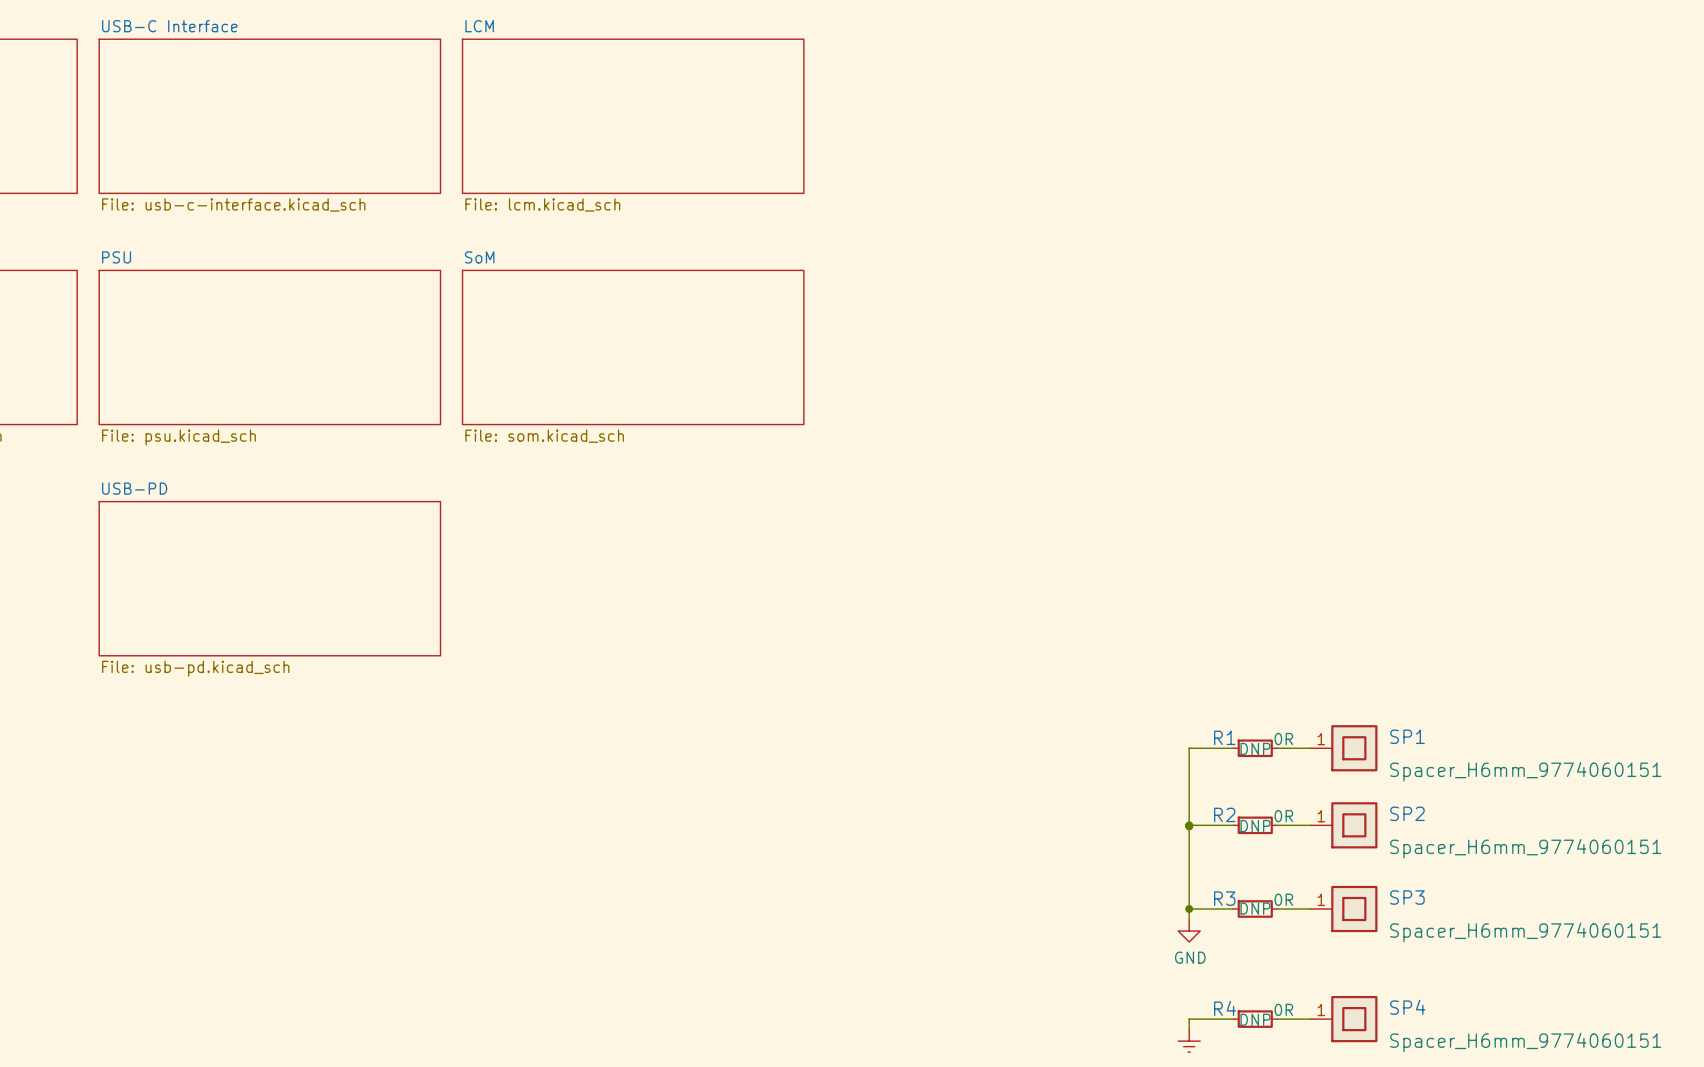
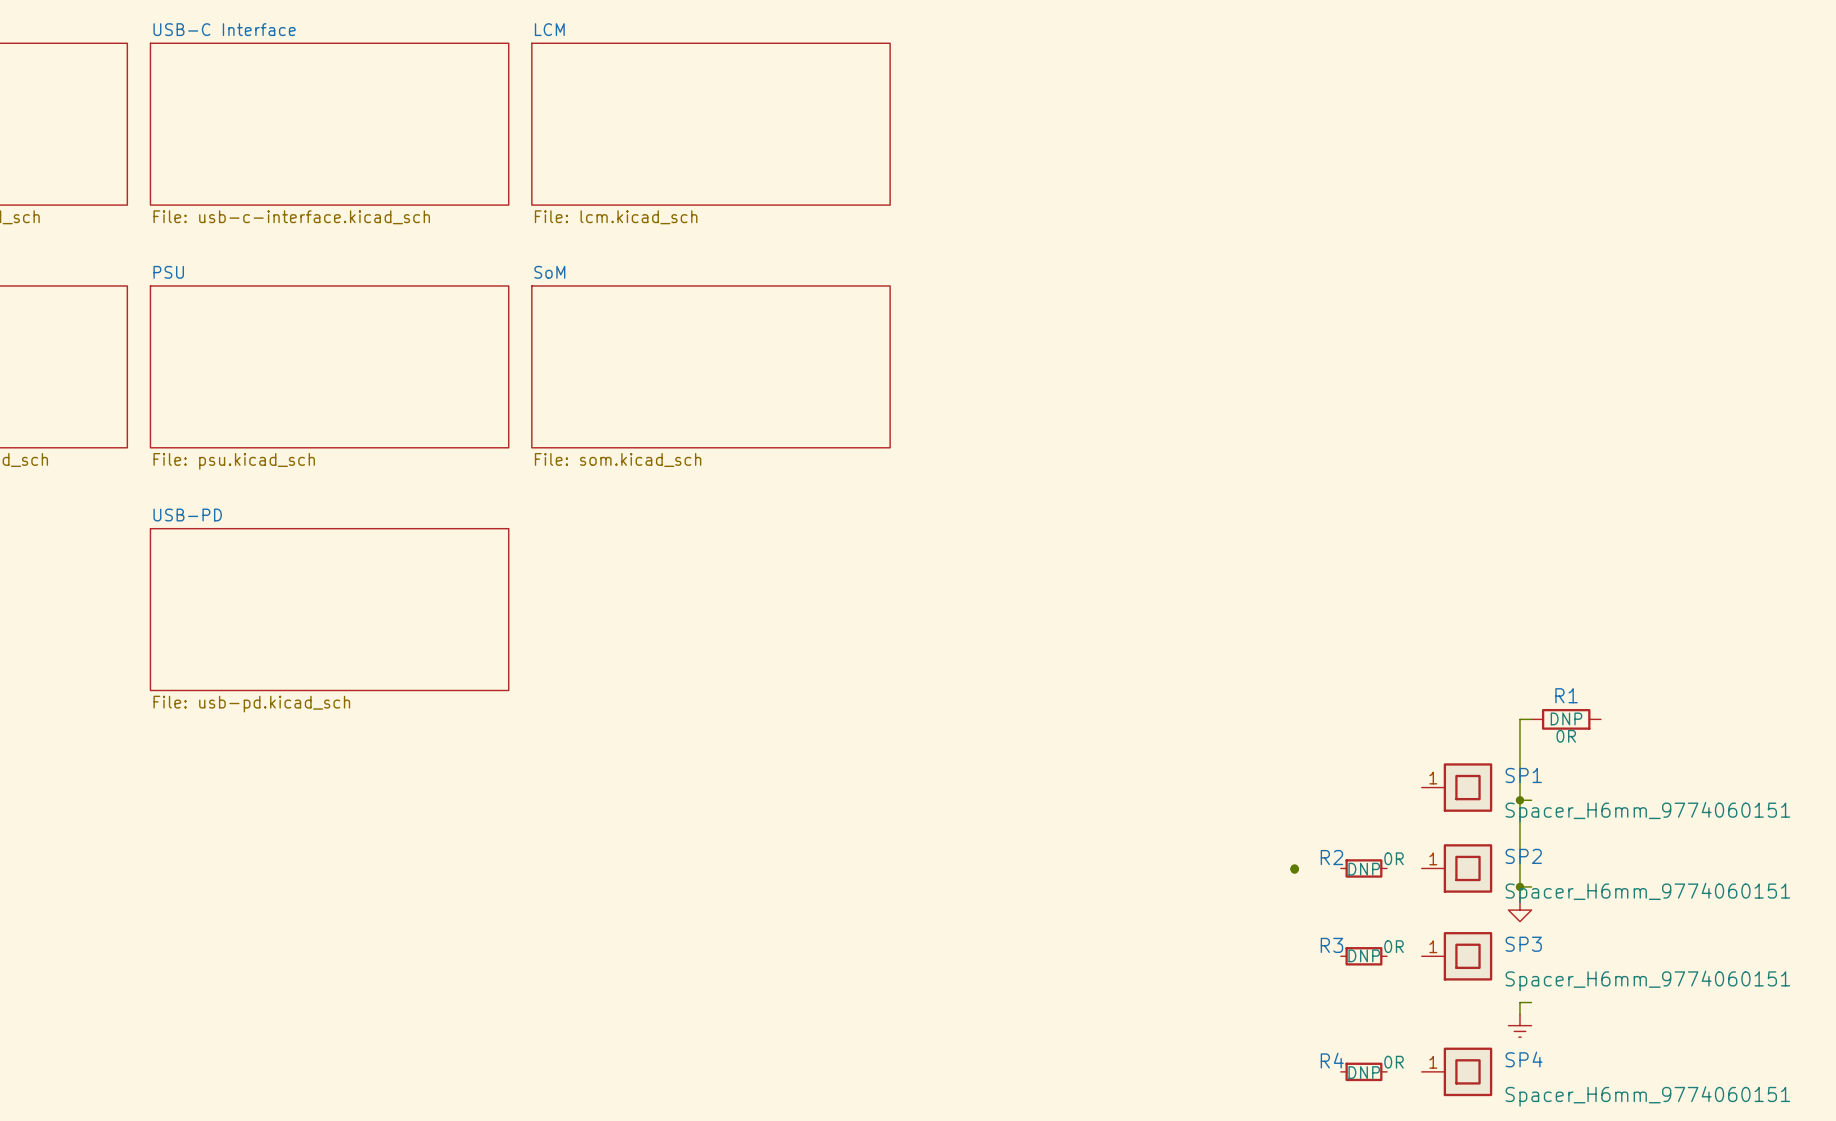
wire: none -> (1531, 719) (1519, 719) (1519, 898)
R1 name position: R1 (1224, 737) -> R1 (1566, 695)
R1 symbol: [1233, 739, 1278, 758] -> [1531, 708, 1601, 730]
R1 text position: 0R (1283, 739) -> 0R (1566, 736)
wire: (1233, 748) (1189, 748) (1189, 920) -> none
wire: (1277, 748) (1310, 748) -> none
wire: none -> (1519, 800) (1531, 800)
junction: none -> (1519, 800)
wire: (1189, 825) (1233, 825) -> none
wire: (1277, 825) (1310, 825) -> none
wire: none -> (1519, 886) (1531, 886)
junction: none -> (1519, 886)
power symbol: none -> (1519, 910)
wire: (1189, 909) (1233, 909) -> none
junction: (1189, 909) -> none
wire: (1277, 909) (1310, 909) -> none
power symbol: GND (1189, 931) -> none
wire: none -> (1531, 1002) (1519, 1002) (1519, 1014)
power symbol: none -> (1519, 1025)
wire: (1233, 1019) (1189, 1019) (1189, 1030) -> none
wire: (1277, 1019) (1310, 1019) -> none
power symbol: (1189, 1041) -> none

